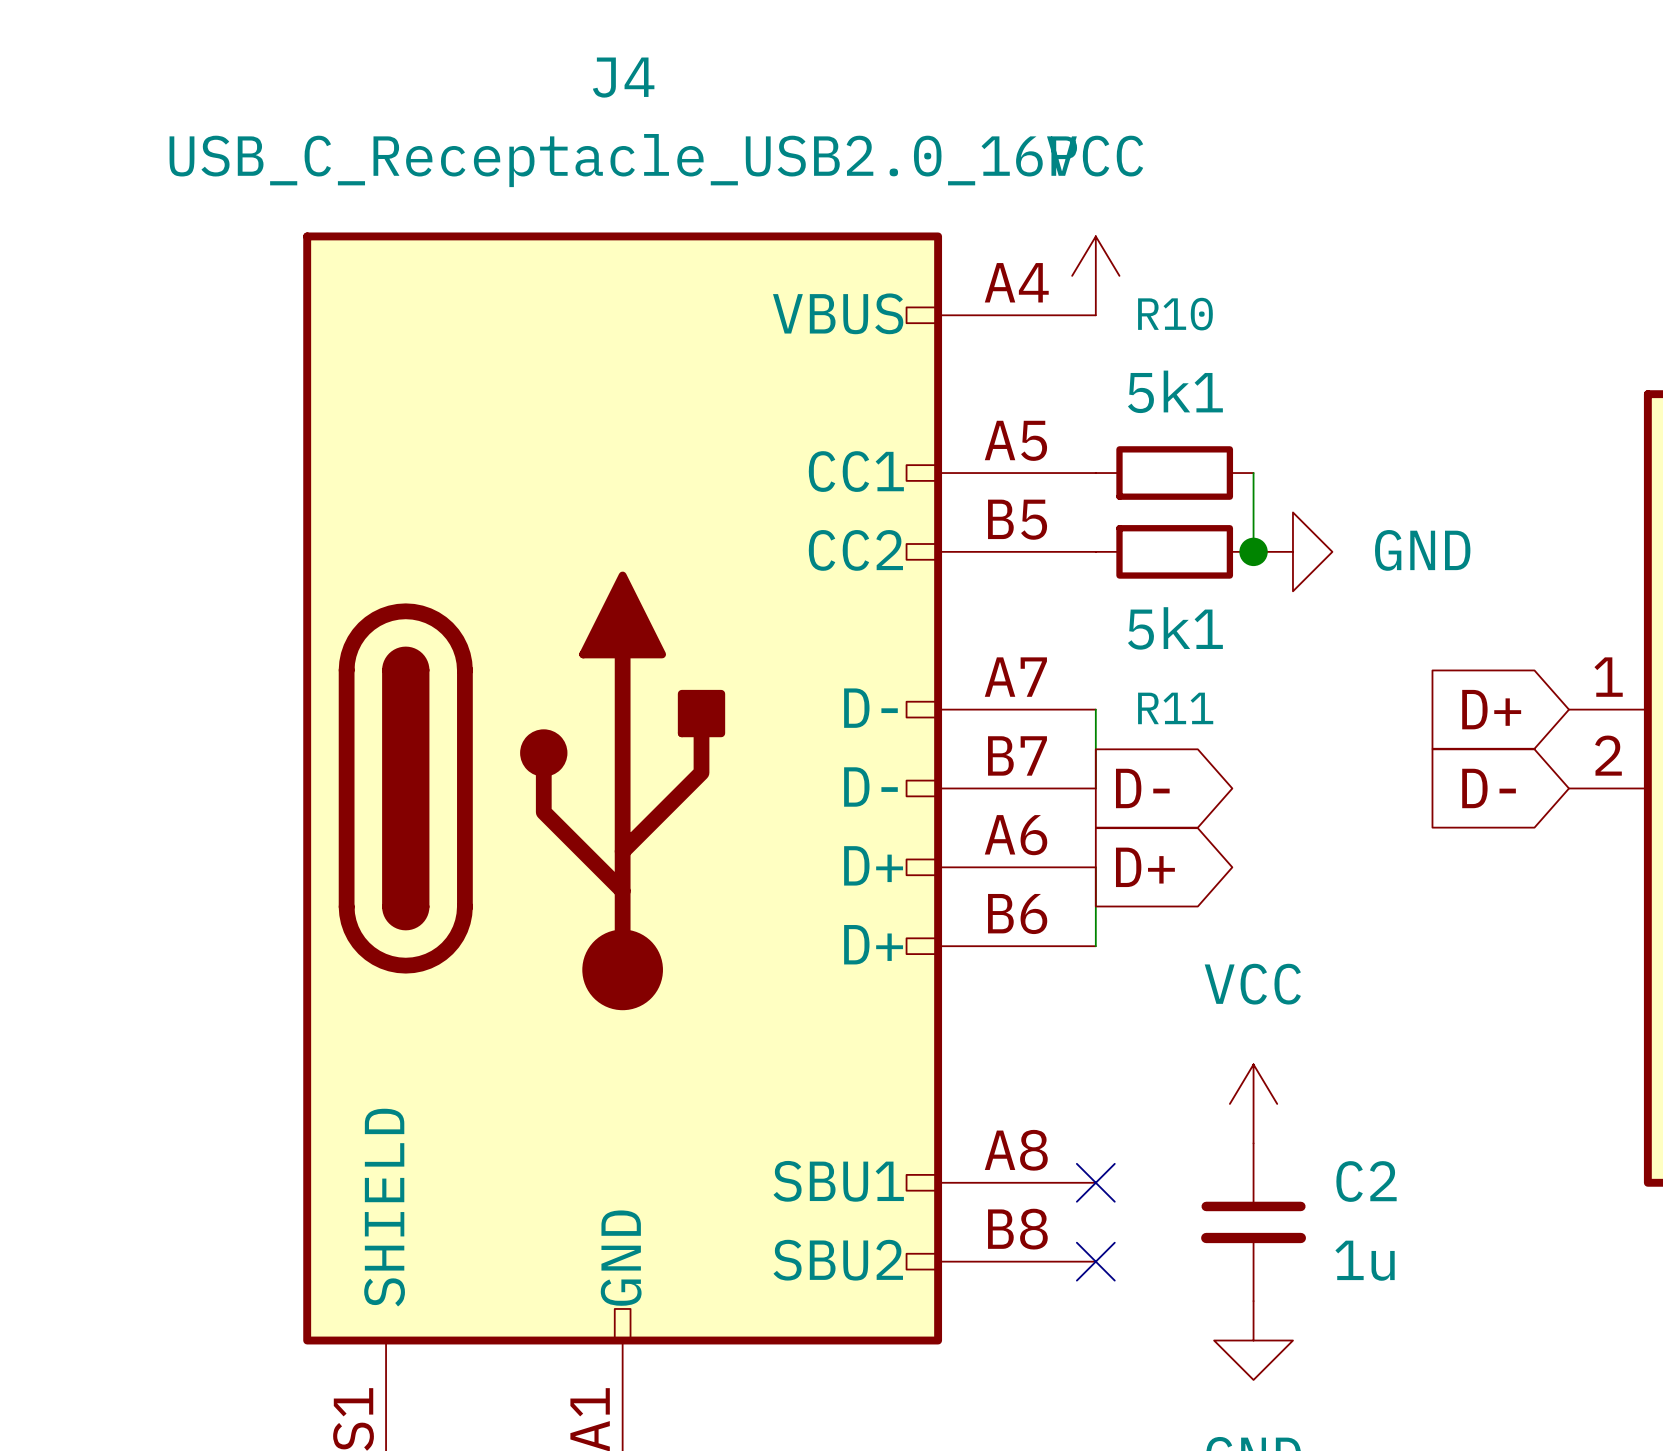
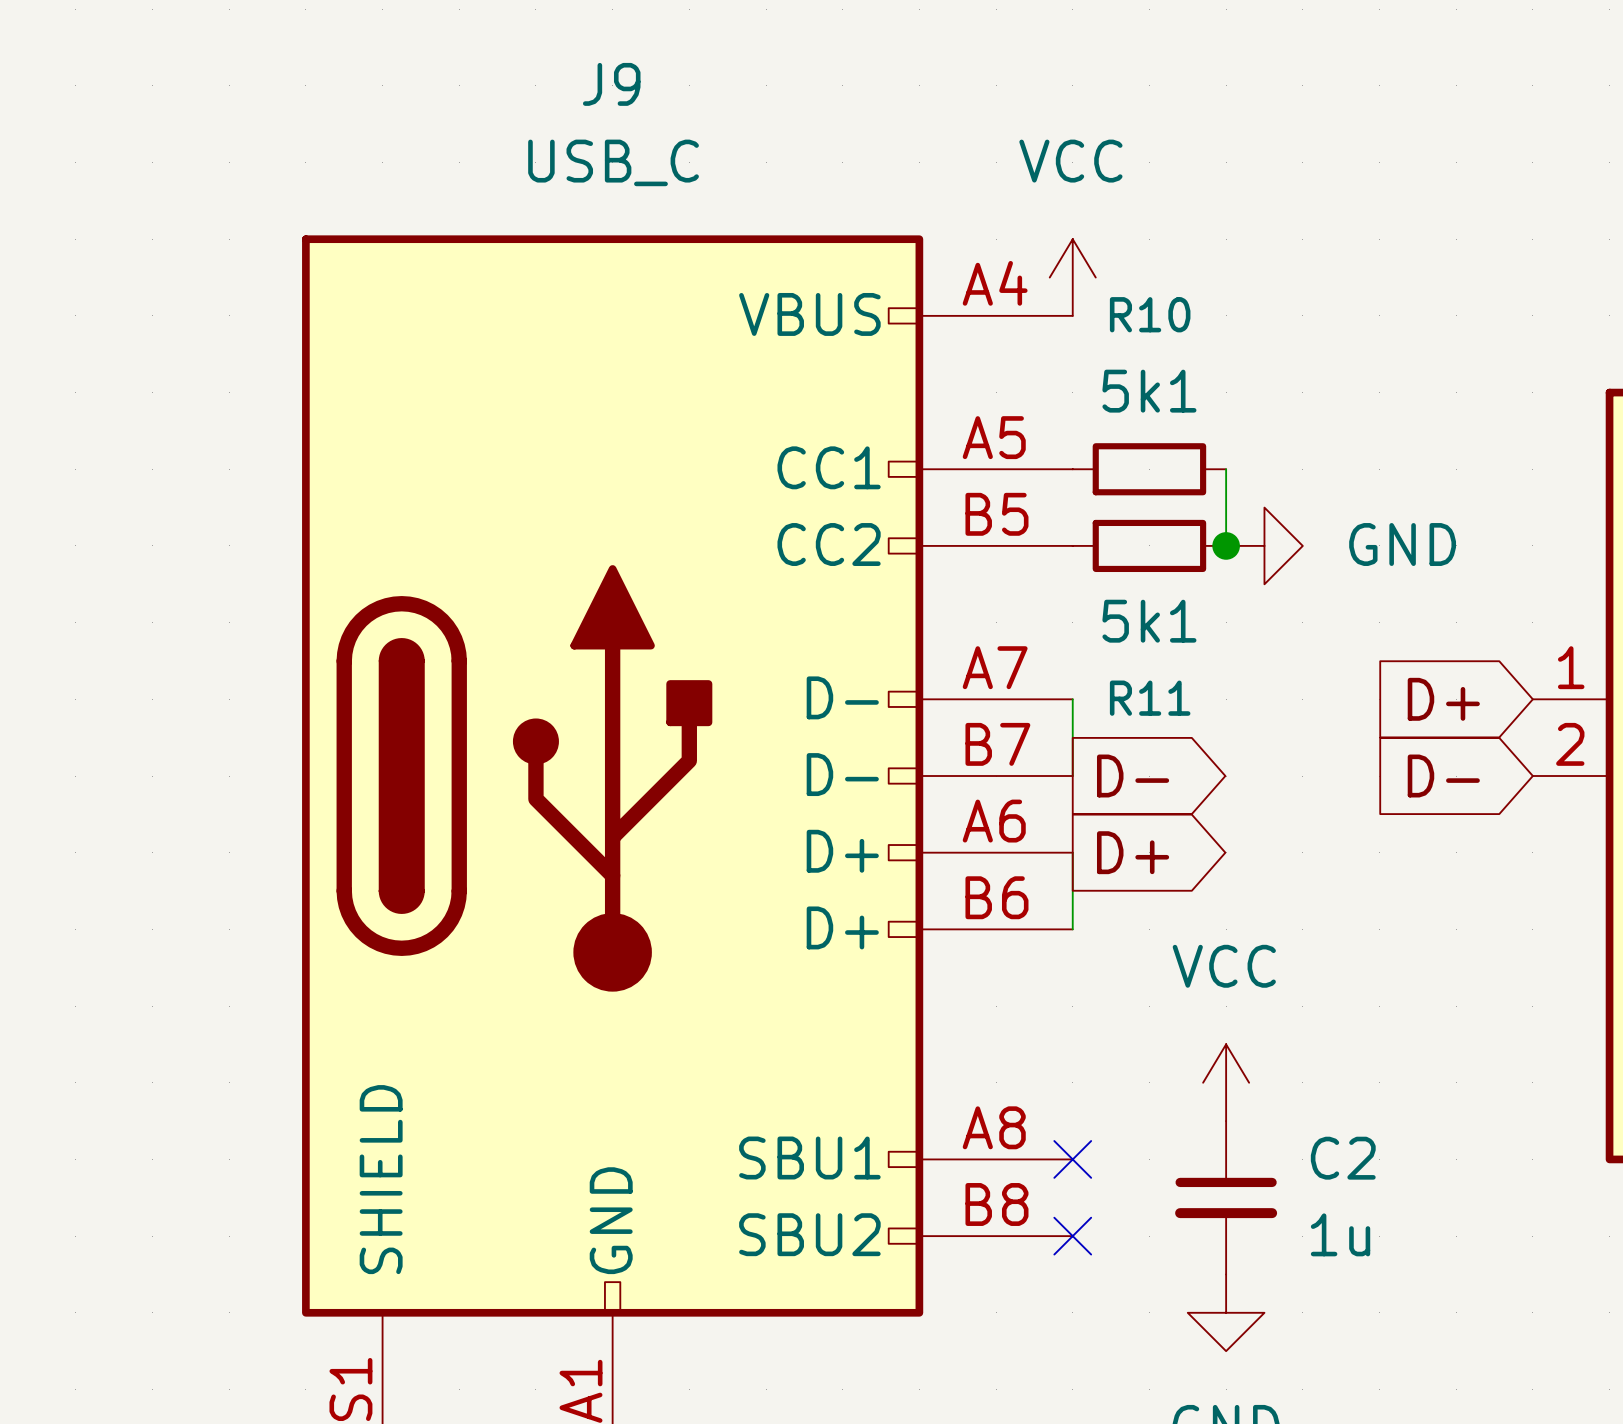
J4 name: J4 (623, 77) -> J9 (611, 84)
J4 value: USB_C_Receptacle_USB2.0_16P (623, 160) -> USB_C (613, 162)

